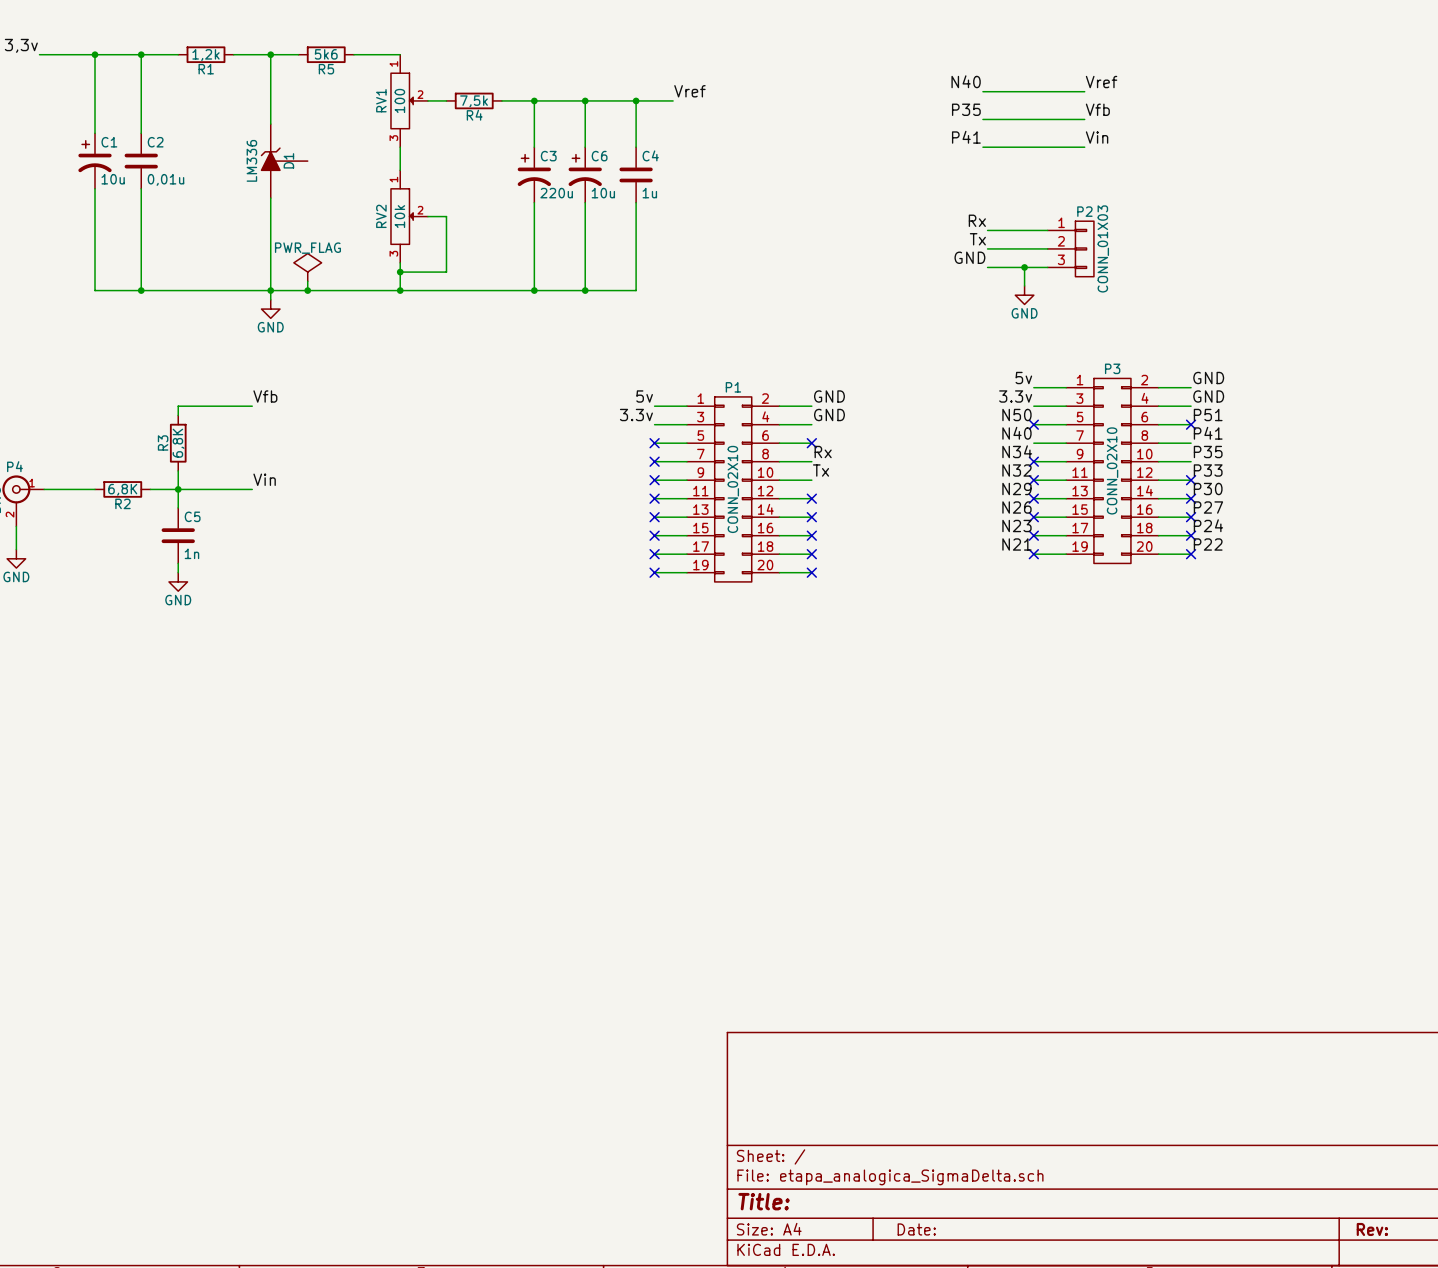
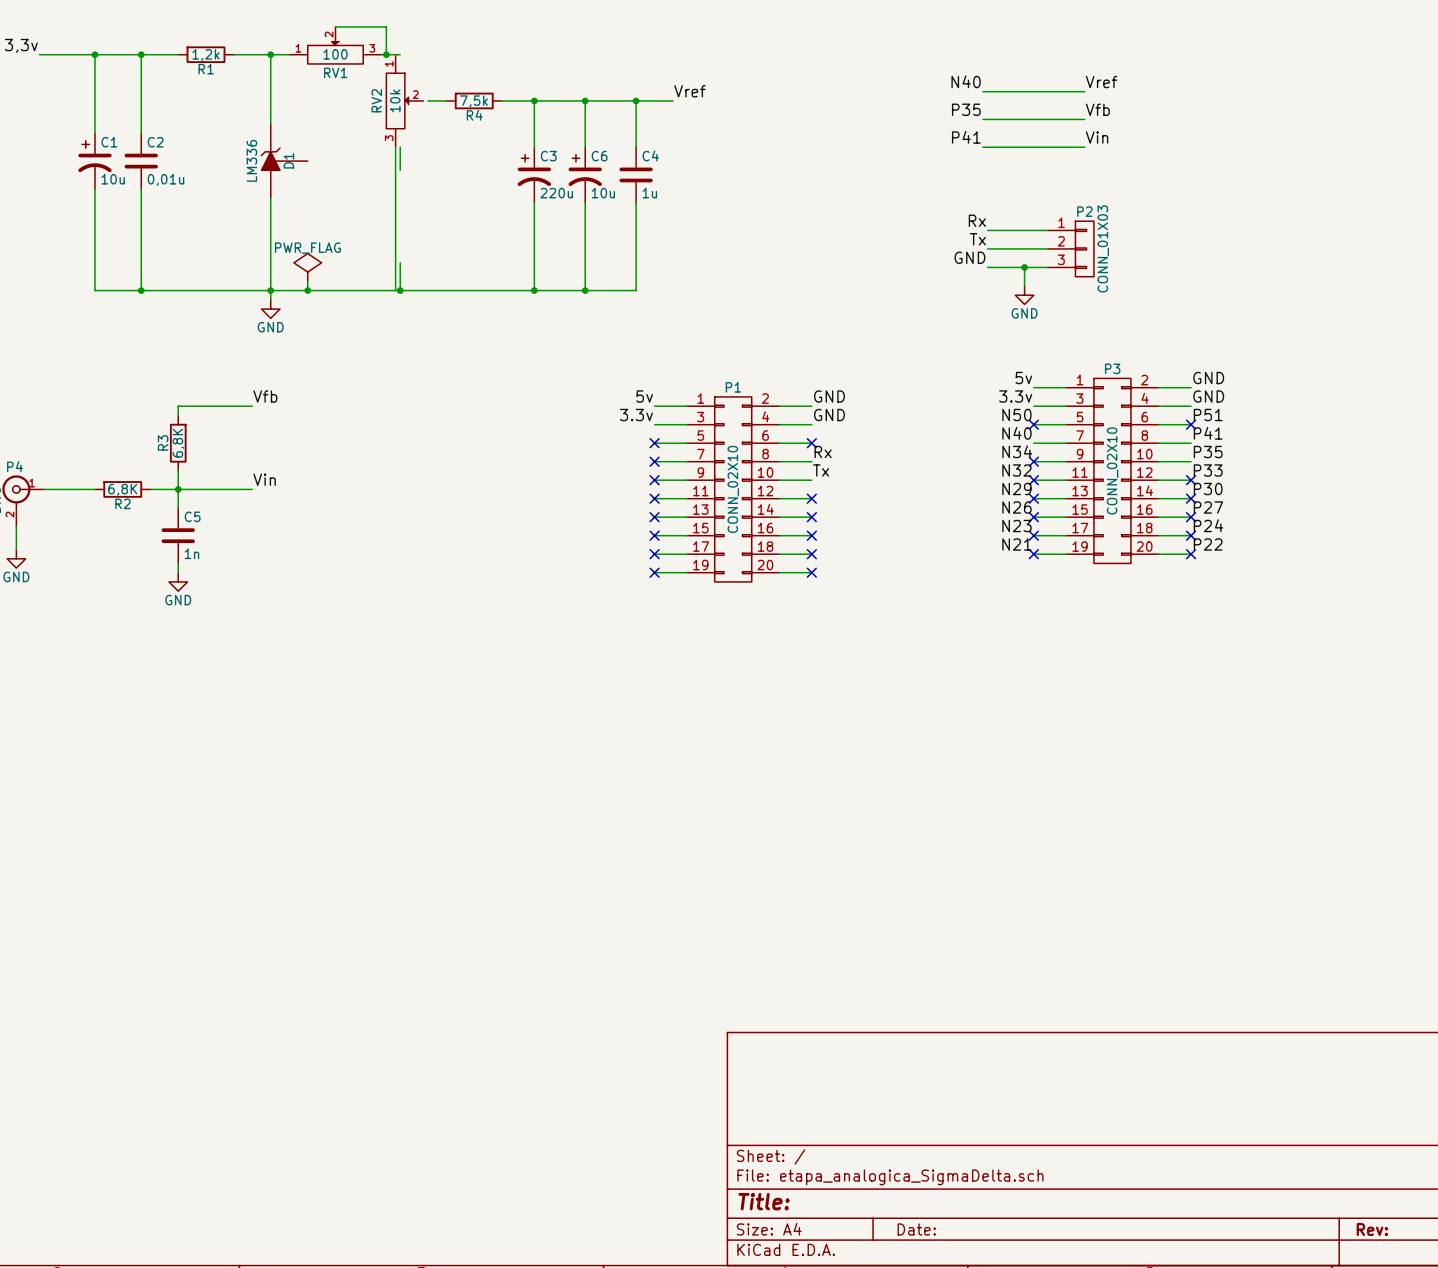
wire: none -> (335, 26) (386, 26) (386, 54)
R5: 5k6 (326, 54) -> none
junction: none -> (386, 54)
RV1 rotation: 0° (402, 100) -> 90° counterclockwise (335, 52)
RV1 position: (409, 100) -> (335, 45)
wire: none -> (395, 147) (395, 290)
RV2 position: (409, 216) -> (404, 100)
wire: (427, 216) (446, 216) (446, 272) (400, 272) -> none
junction: (400, 272) -> none

